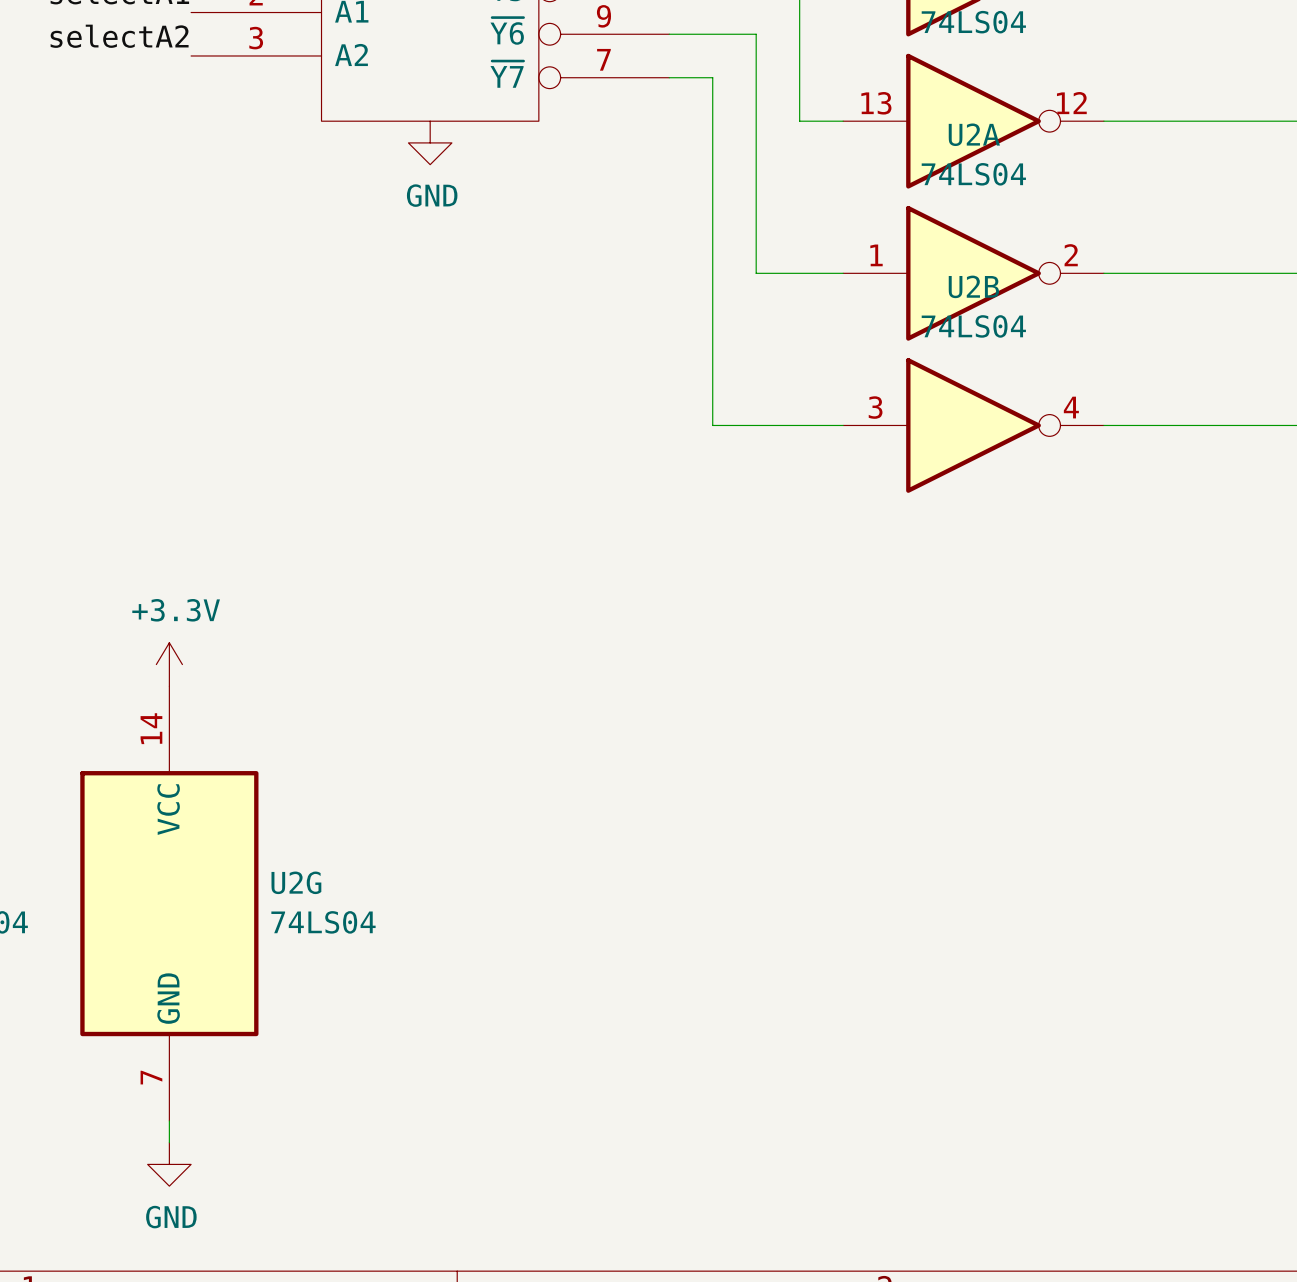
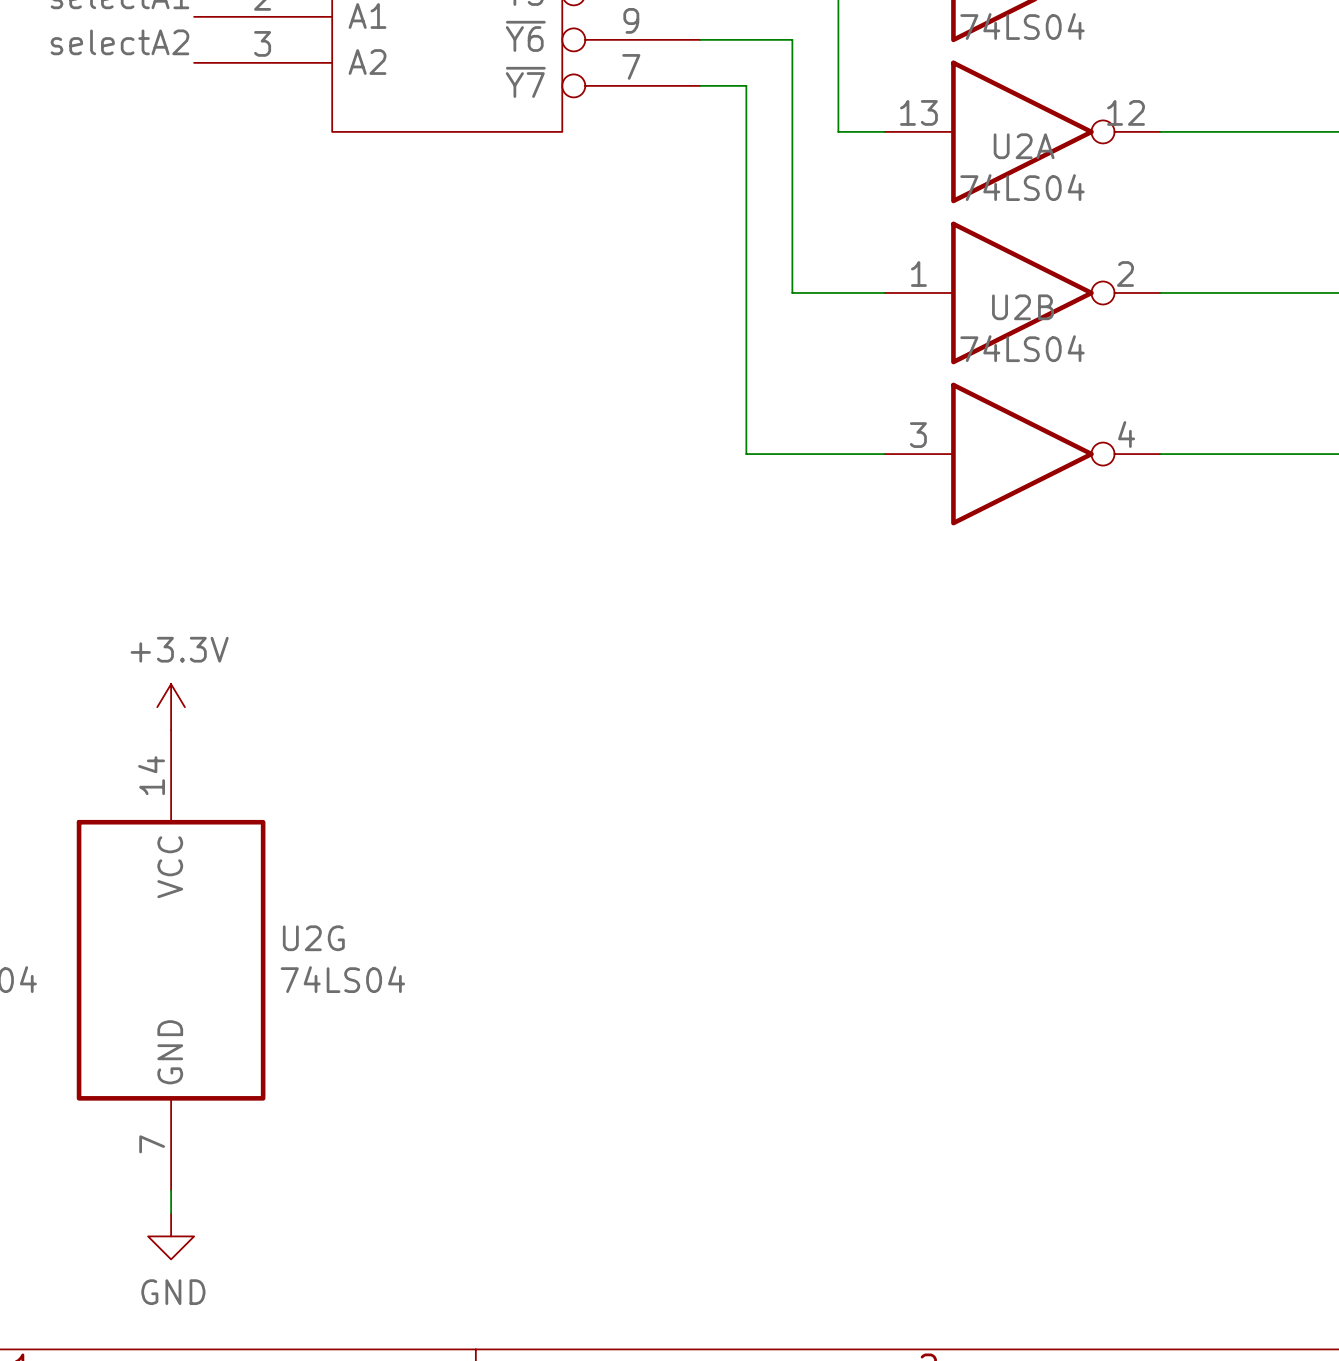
power symbol: GND (430, 142) -> none

